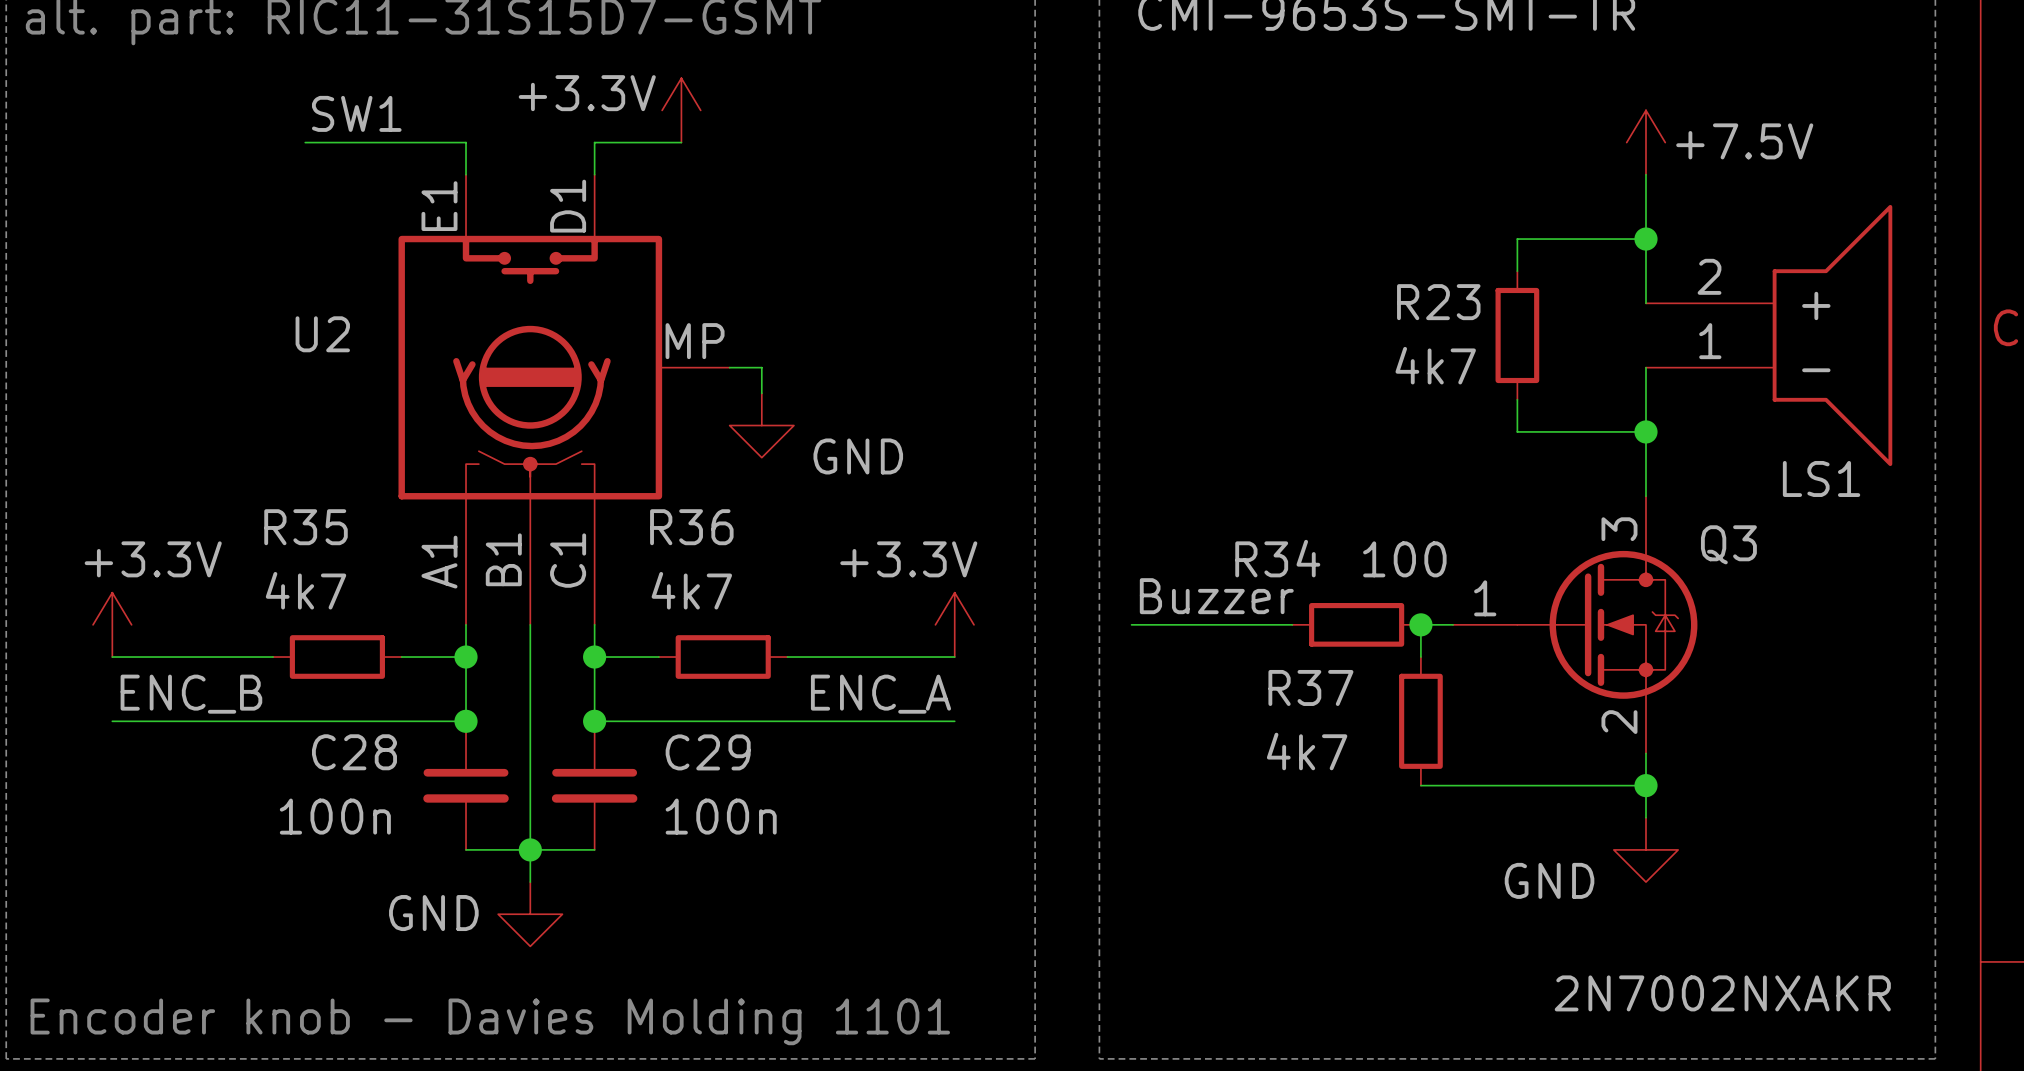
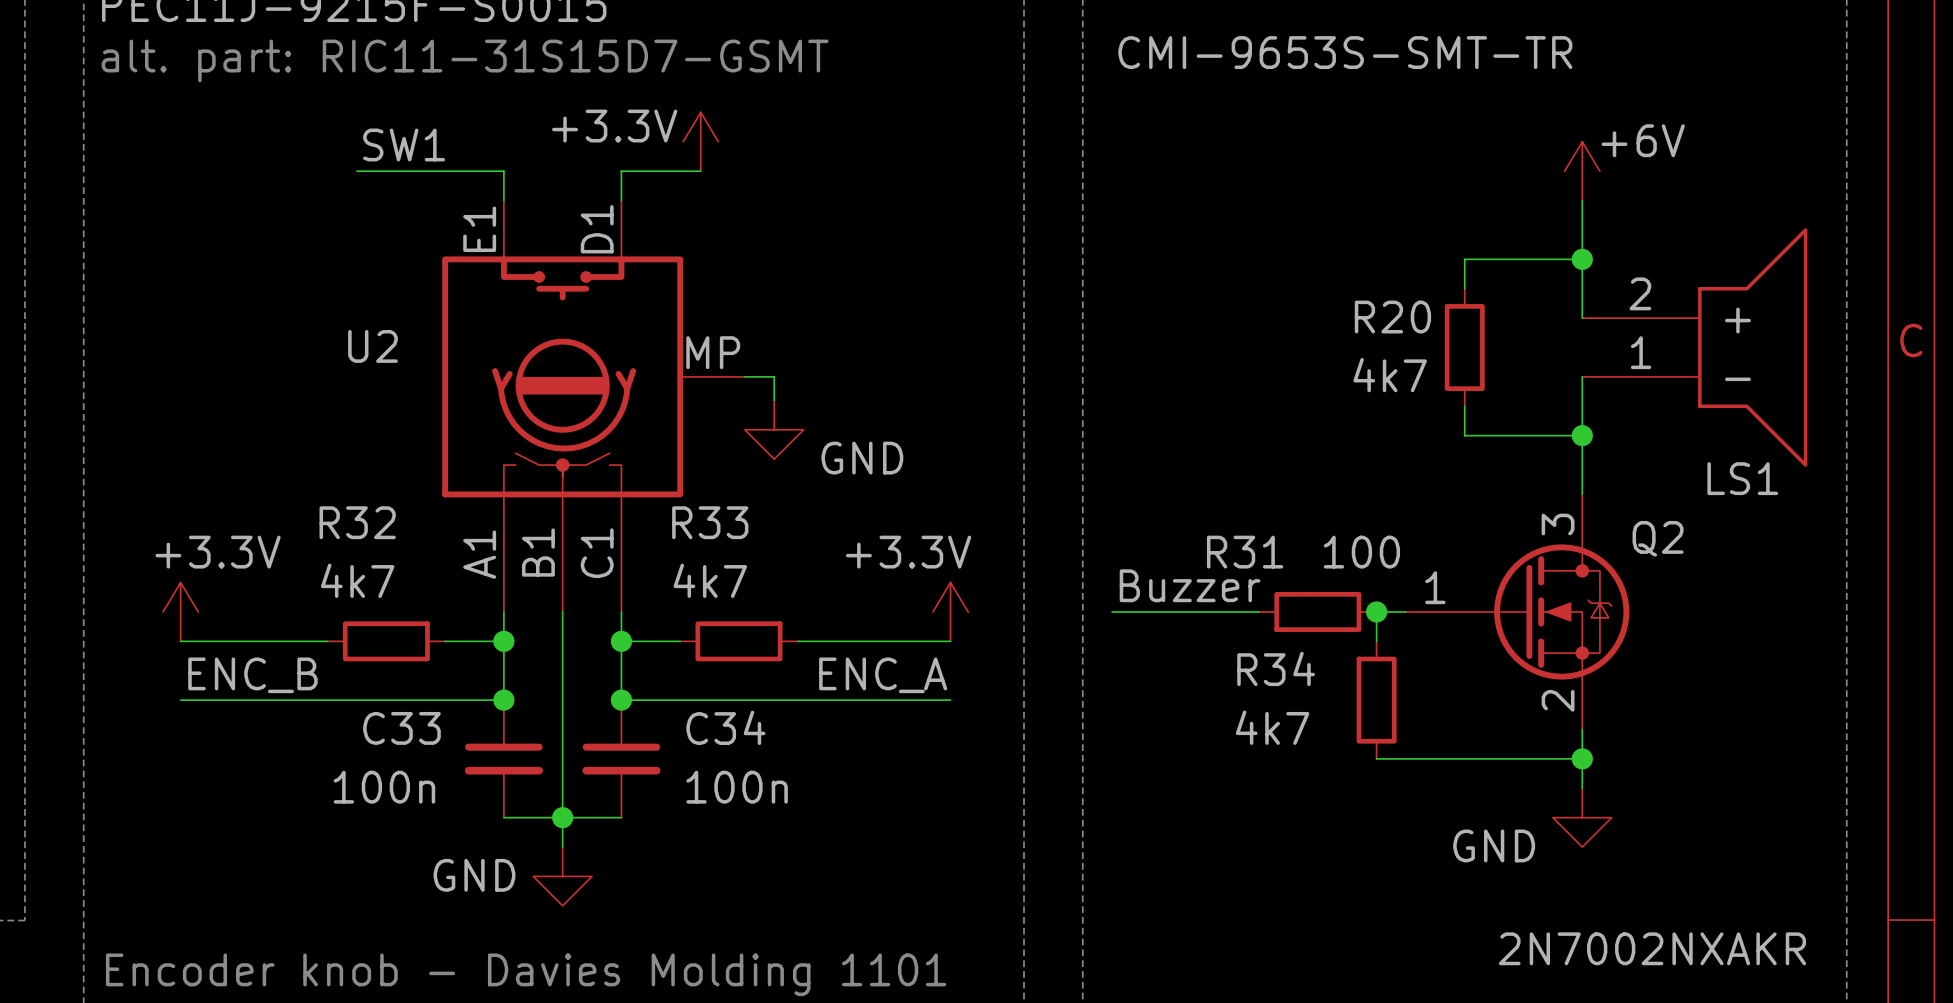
power symbol: +7.5V (1645, 142) -> +6V (1582, 171)
R23 name: R23 (1438, 302) -> R20 (1392, 317)
R35 name: R35 (306, 527) -> R32 (357, 522)
R36 name: R36 (691, 527) -> R33 (710, 522)
Q3 name: Q3 (1728, 544) -> Q2 (1658, 538)
R34 name: R34 (1277, 558) -> R31 (1245, 552)
R37 name: R37 (1310, 687) -> R34 (1276, 668)
C28 name: C28 (354, 752) -> C33 (401, 728)
C29 name: C29 (708, 752) -> C34 (725, 727)

